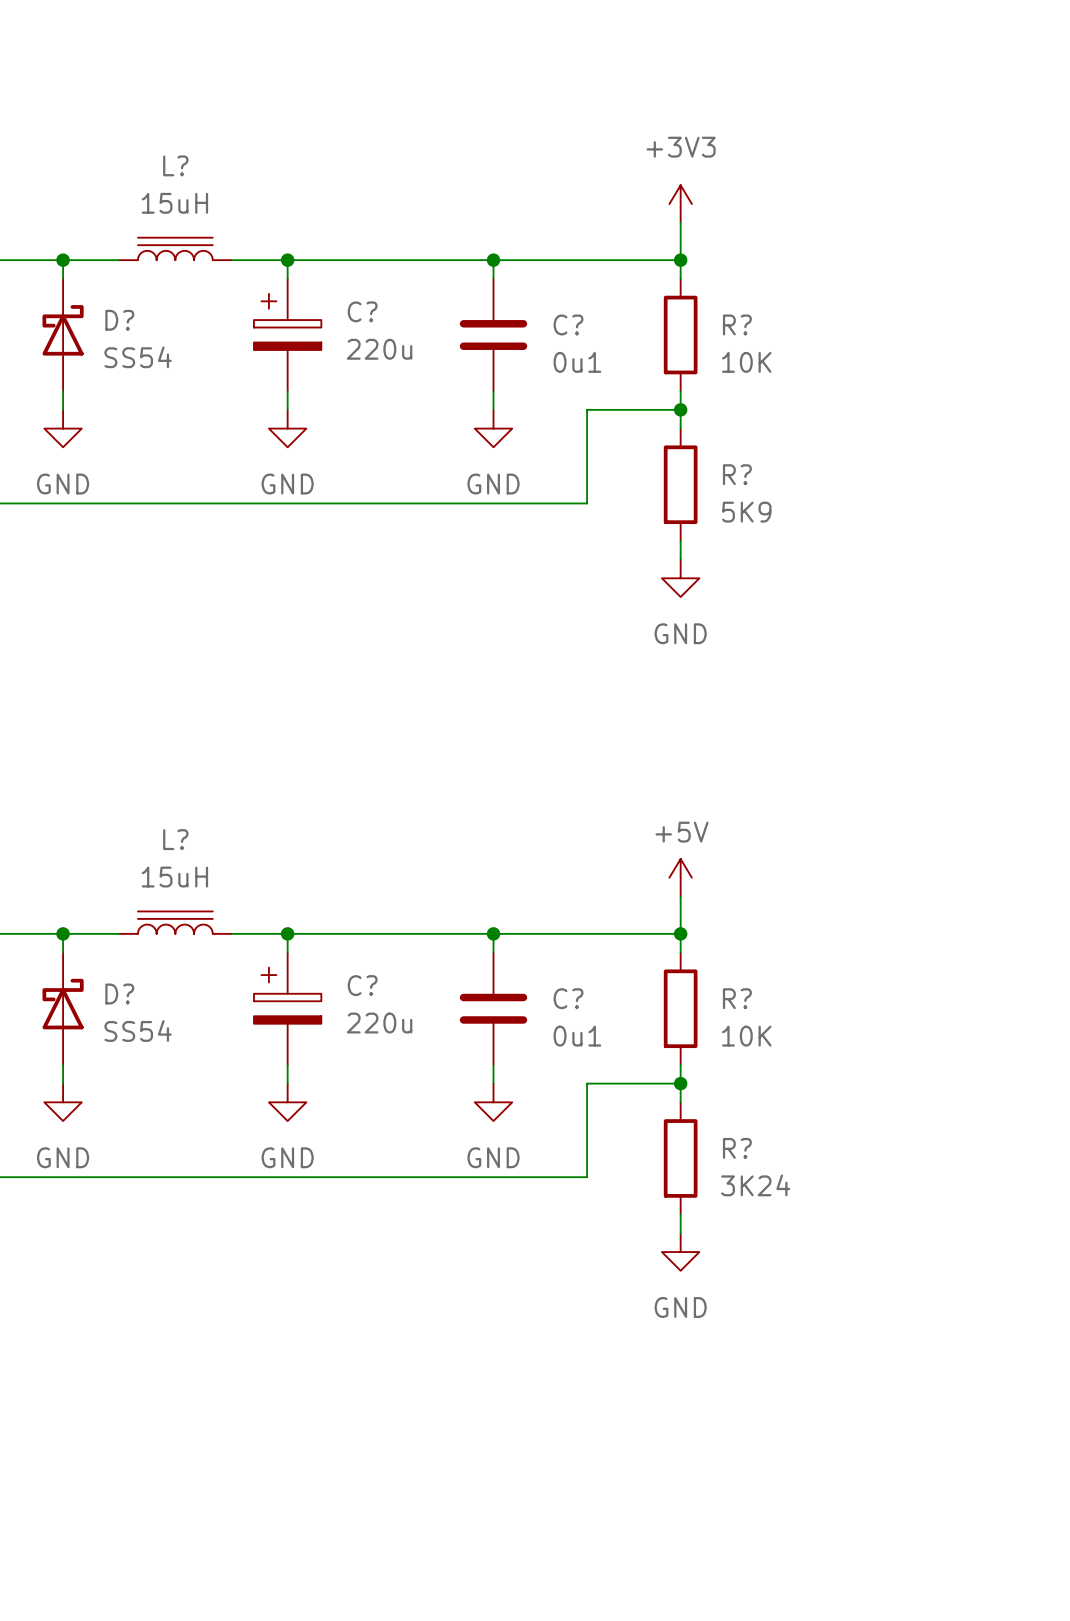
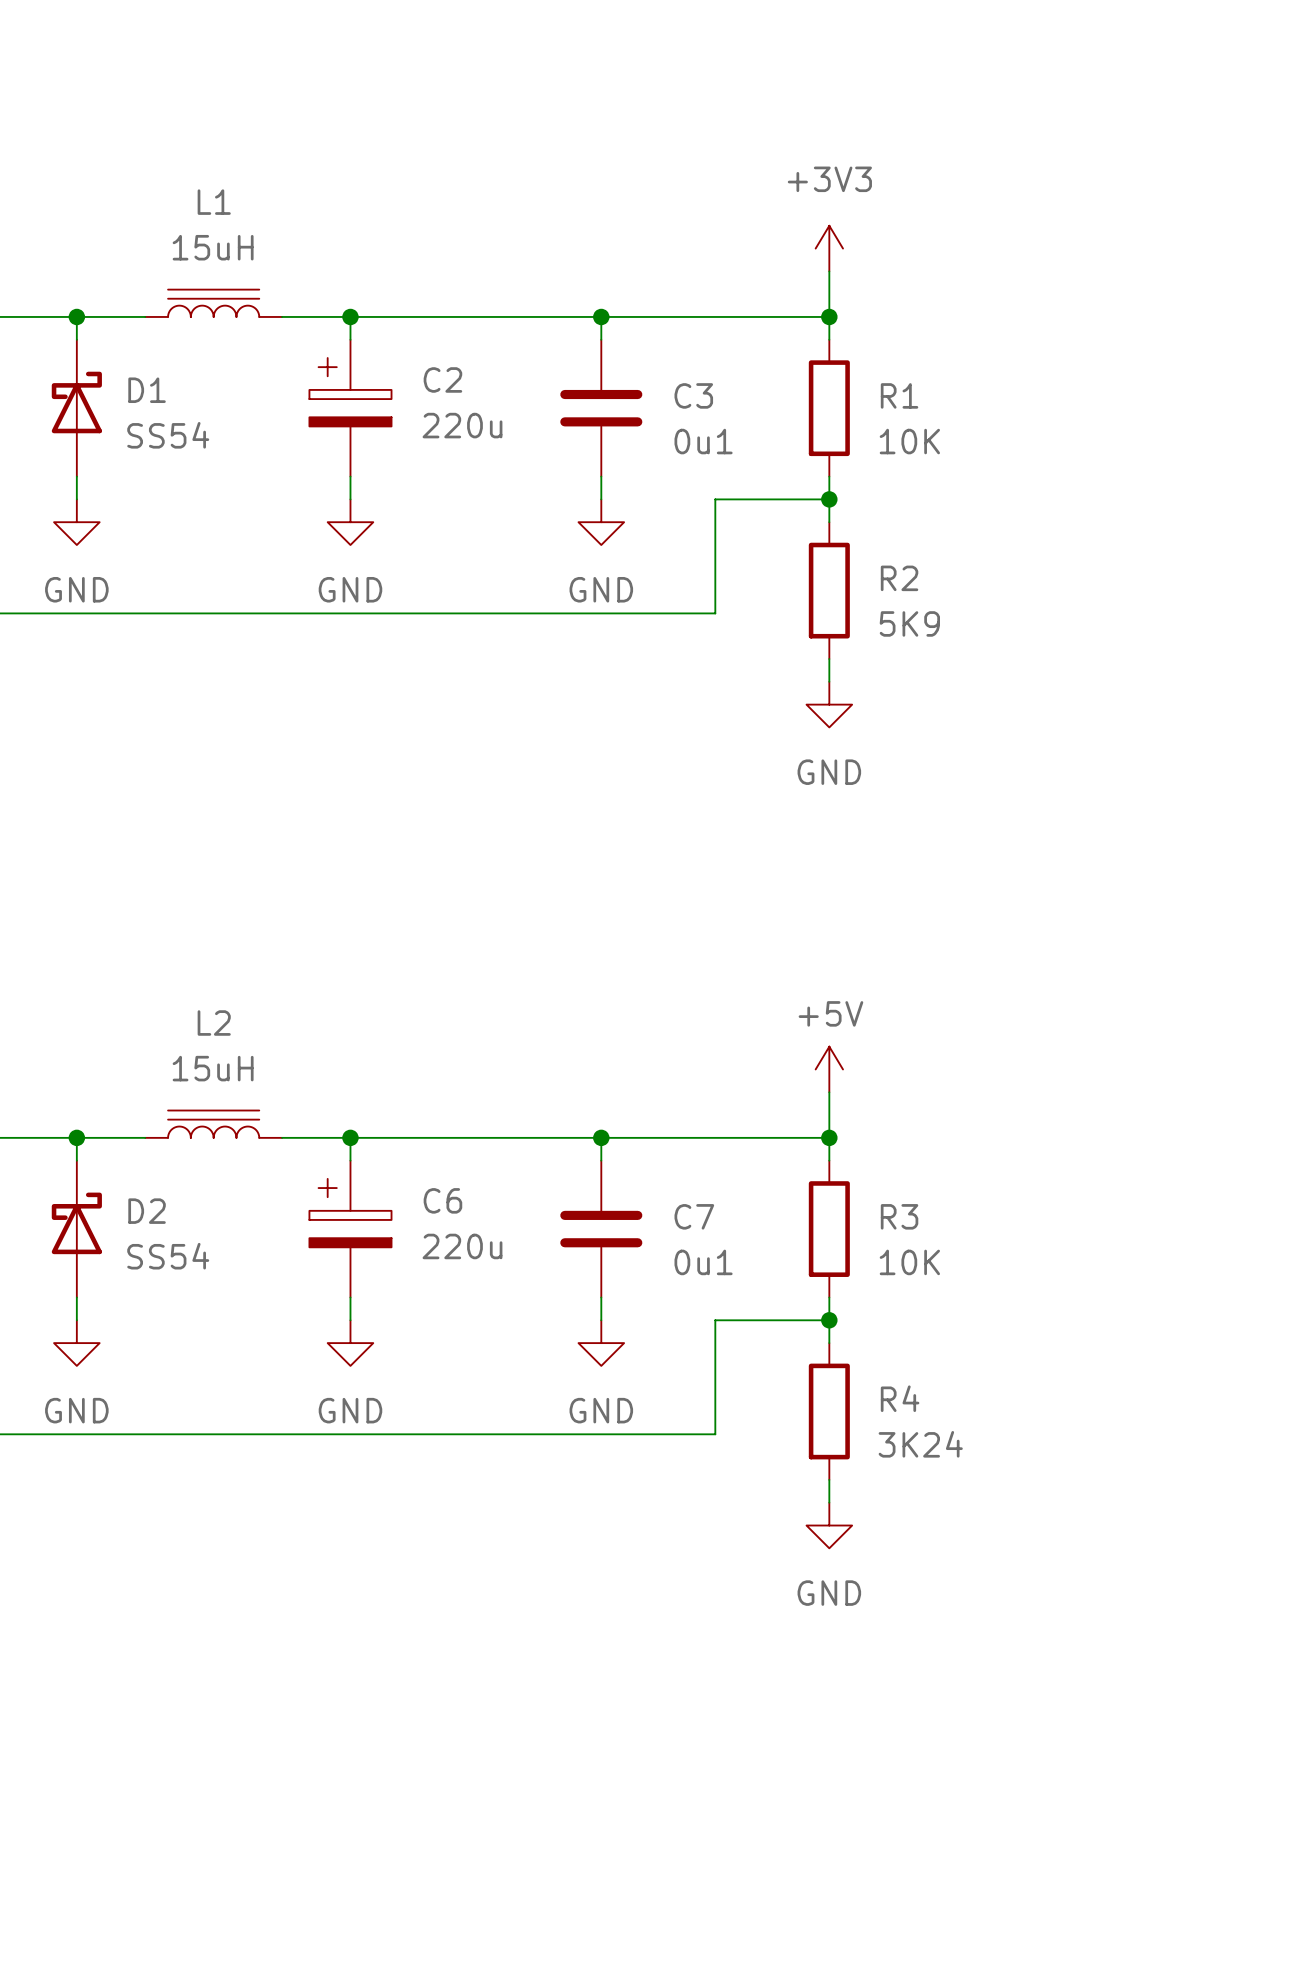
L? name: L? (175, 165) -> L1 (214, 202)
C? name: C? (362, 311) -> C2 (442, 379)
D? name: D? (119, 320) -> D1 (147, 390)
C? name: C? (568, 324) -> C3 (693, 395)
R? name: R? (737, 324) -> R1 (899, 395)
R? name: R? (737, 474) -> R2 (899, 578)
L? name: L? (175, 839) -> L2 (214, 1023)
C? name: C? (362, 985) -> C6 (442, 1200)
D? name: D? (119, 994) -> D2 (147, 1211)
C? name: C? (568, 998) -> C7 (694, 1216)
R? name: R? (737, 998) -> R3 (899, 1216)
R? name: R? (737, 1148) -> R4 (900, 1398)

